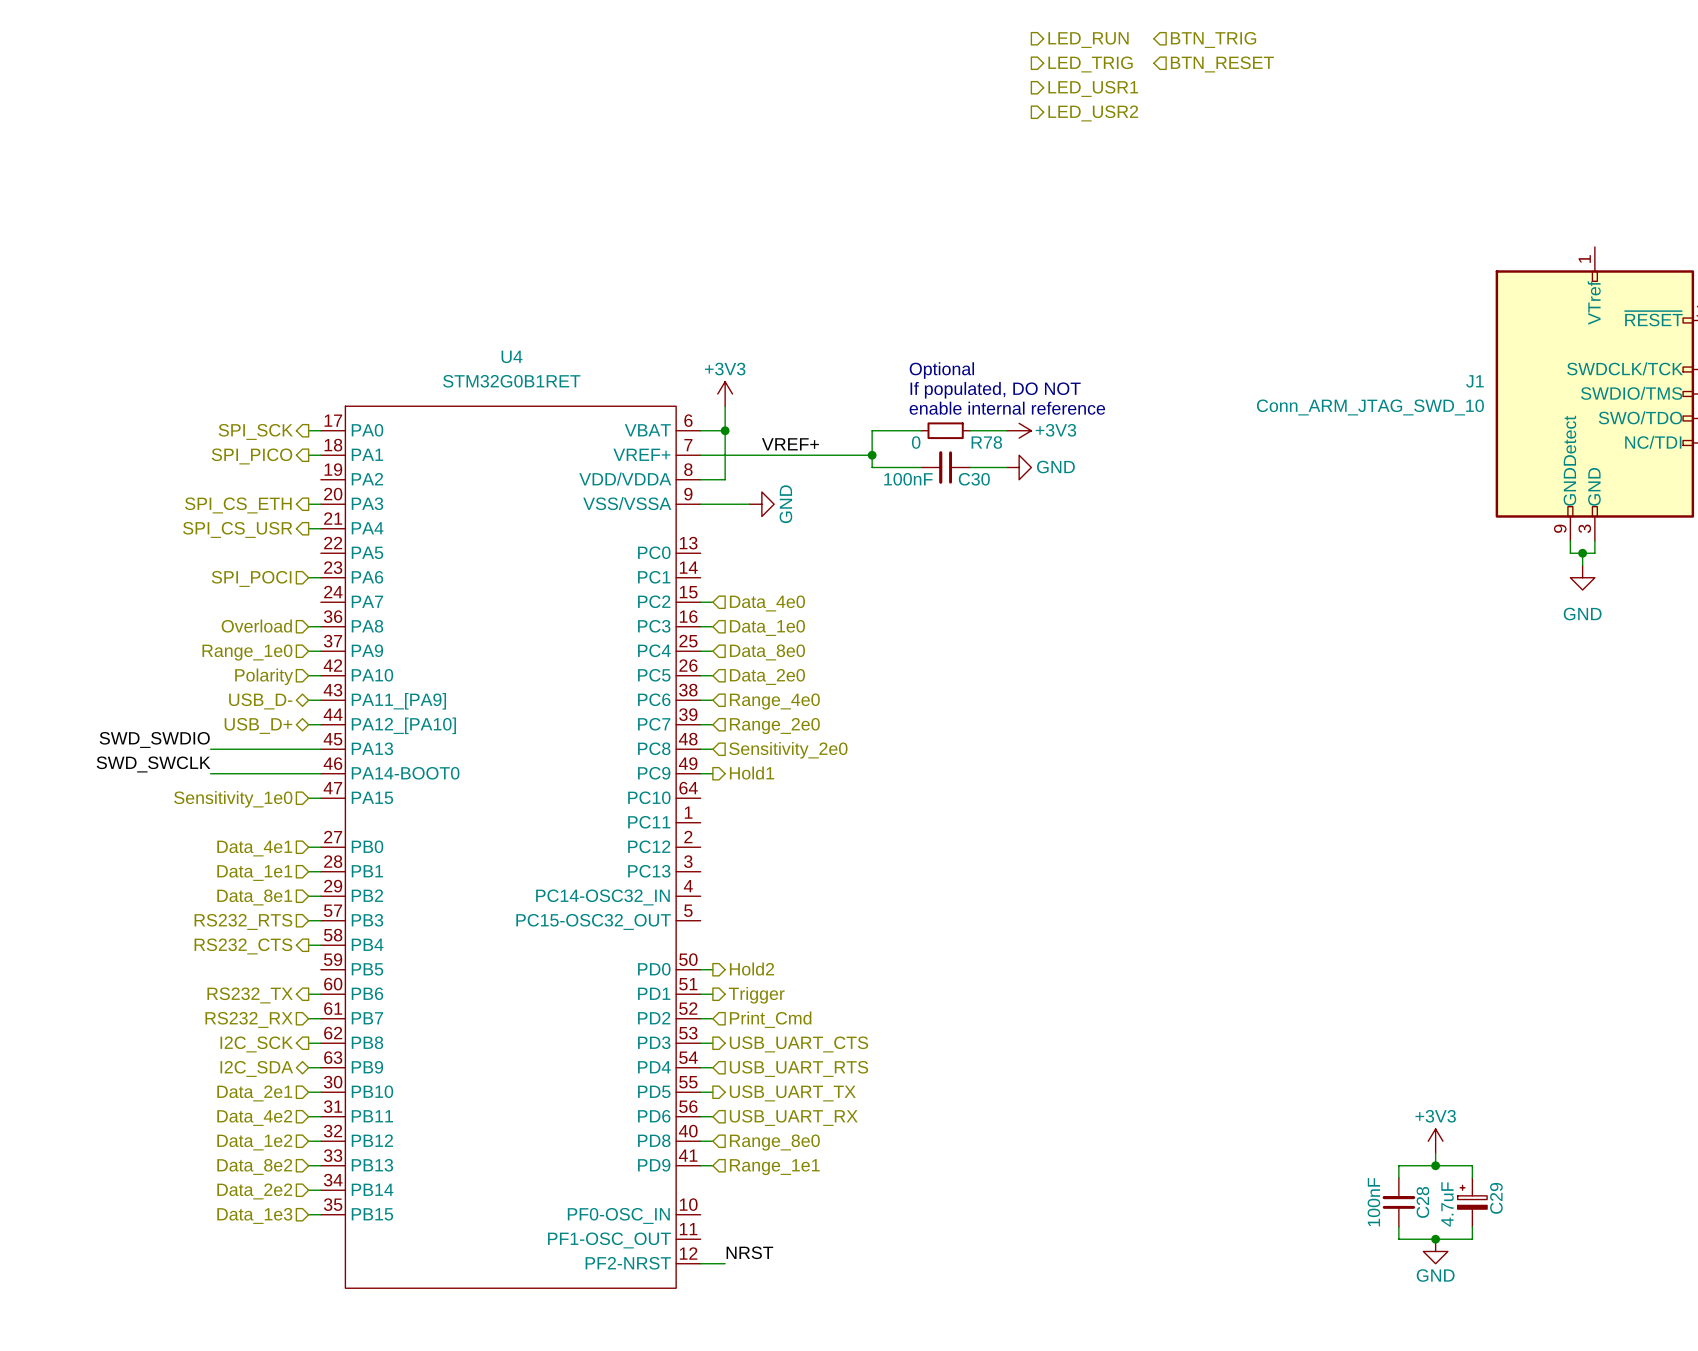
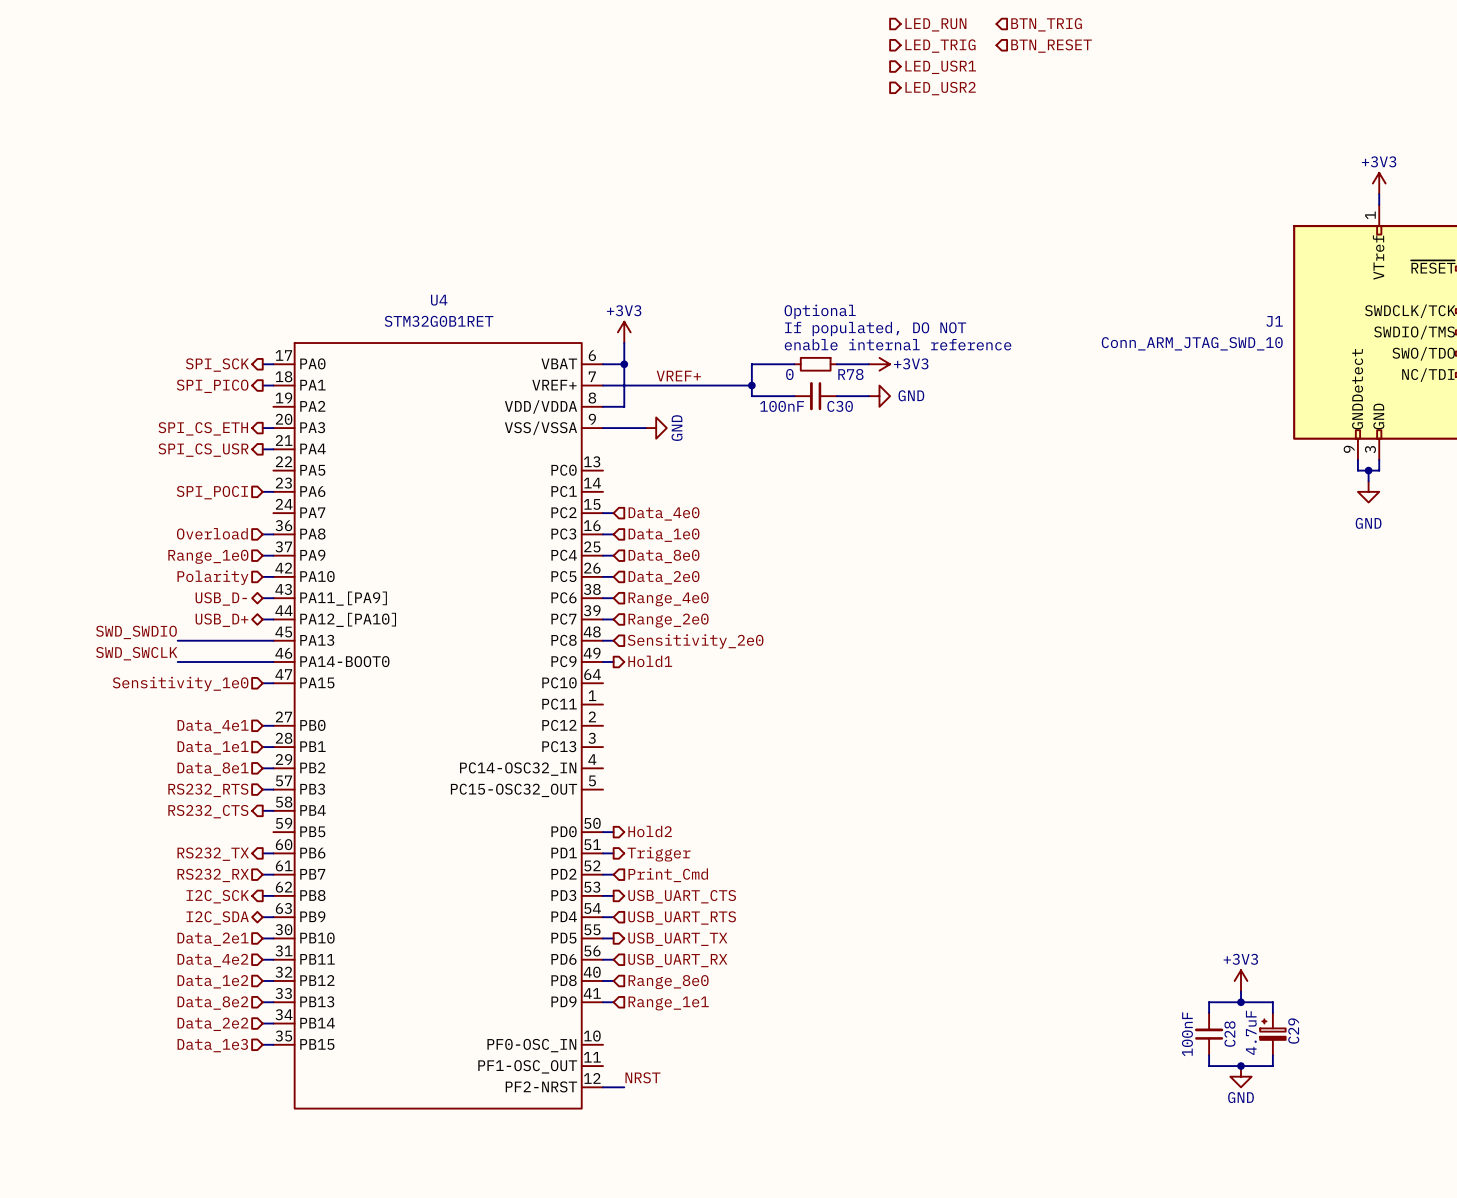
power symbol: none -> +3V3 (1379, 183)
wire: none -> (1379, 194) (1379, 204)

